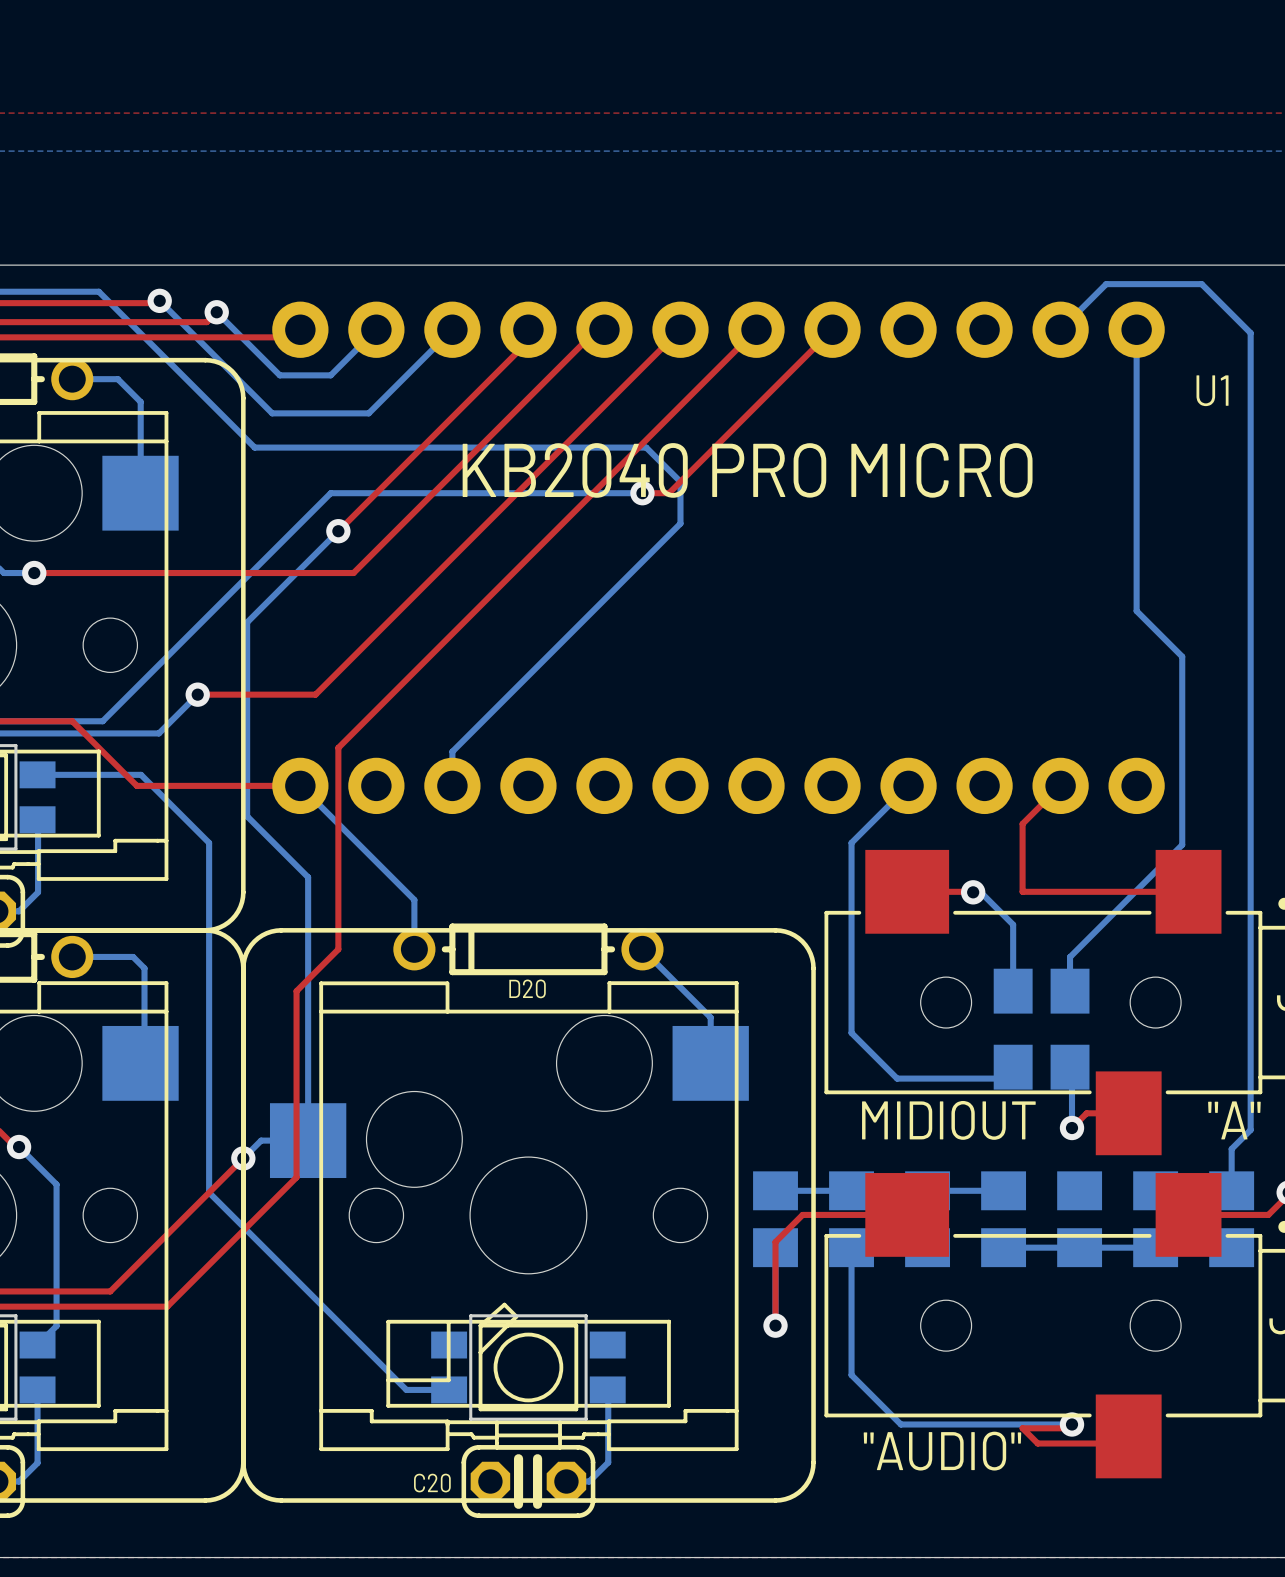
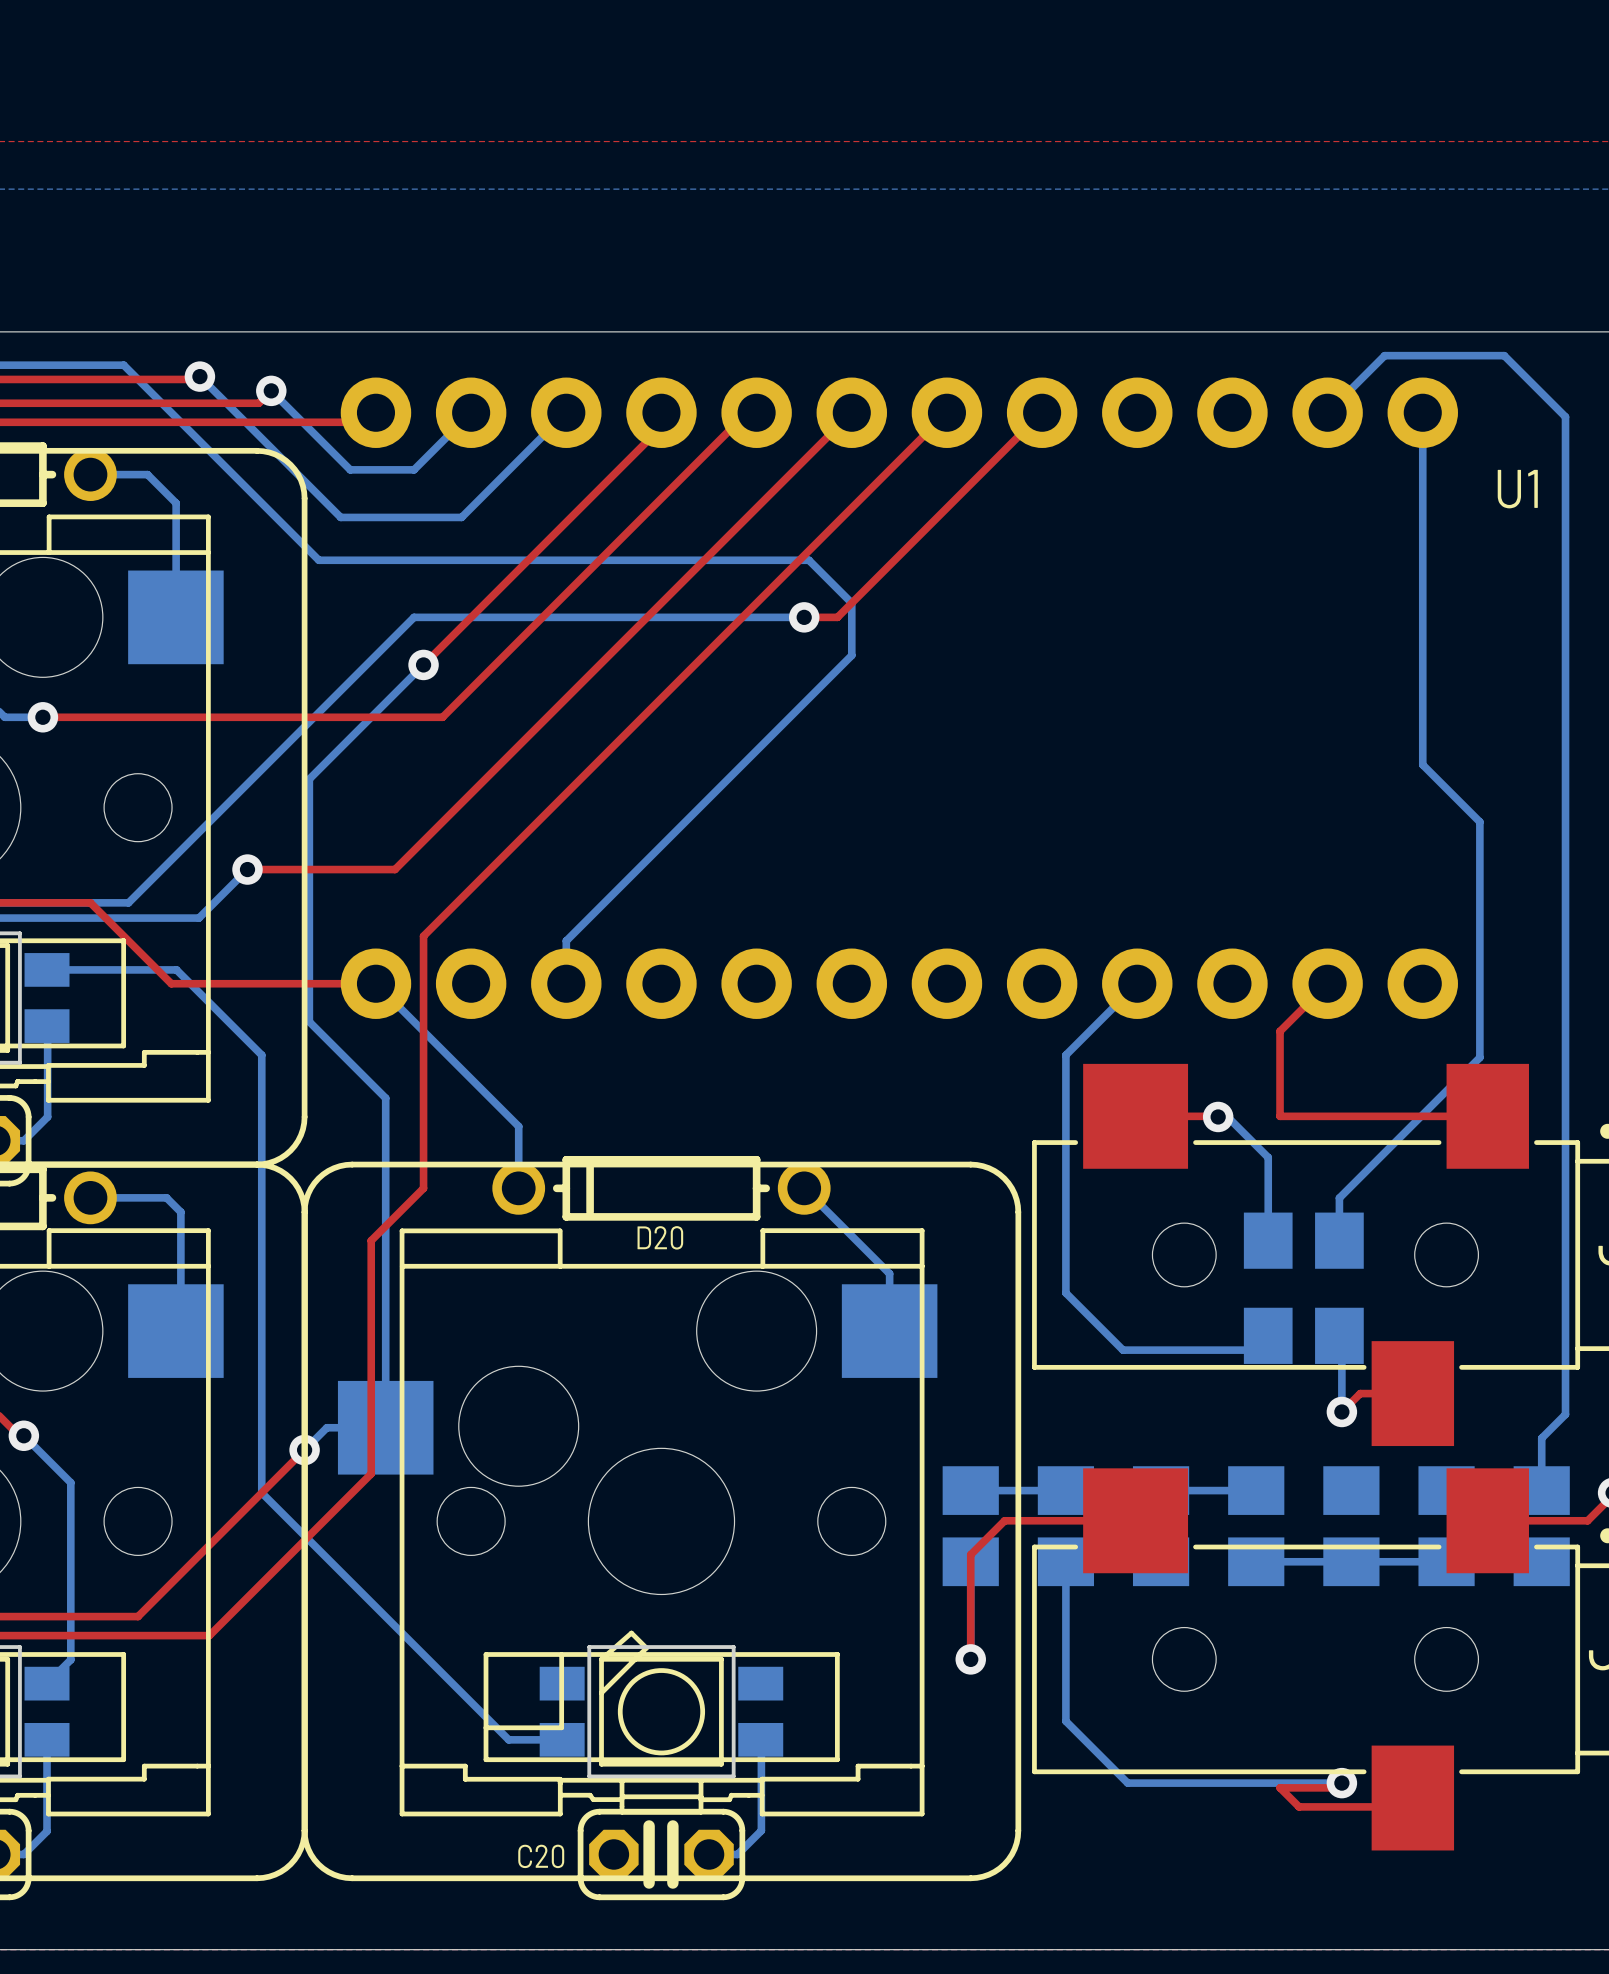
text: KB2040 PRO MICRO (747, 470) -> none
text: MIDIOUT (948, 1120) -> none
text: "A" (1234, 1120) -> none
text: "AUDIO" (942, 1451) -> none

